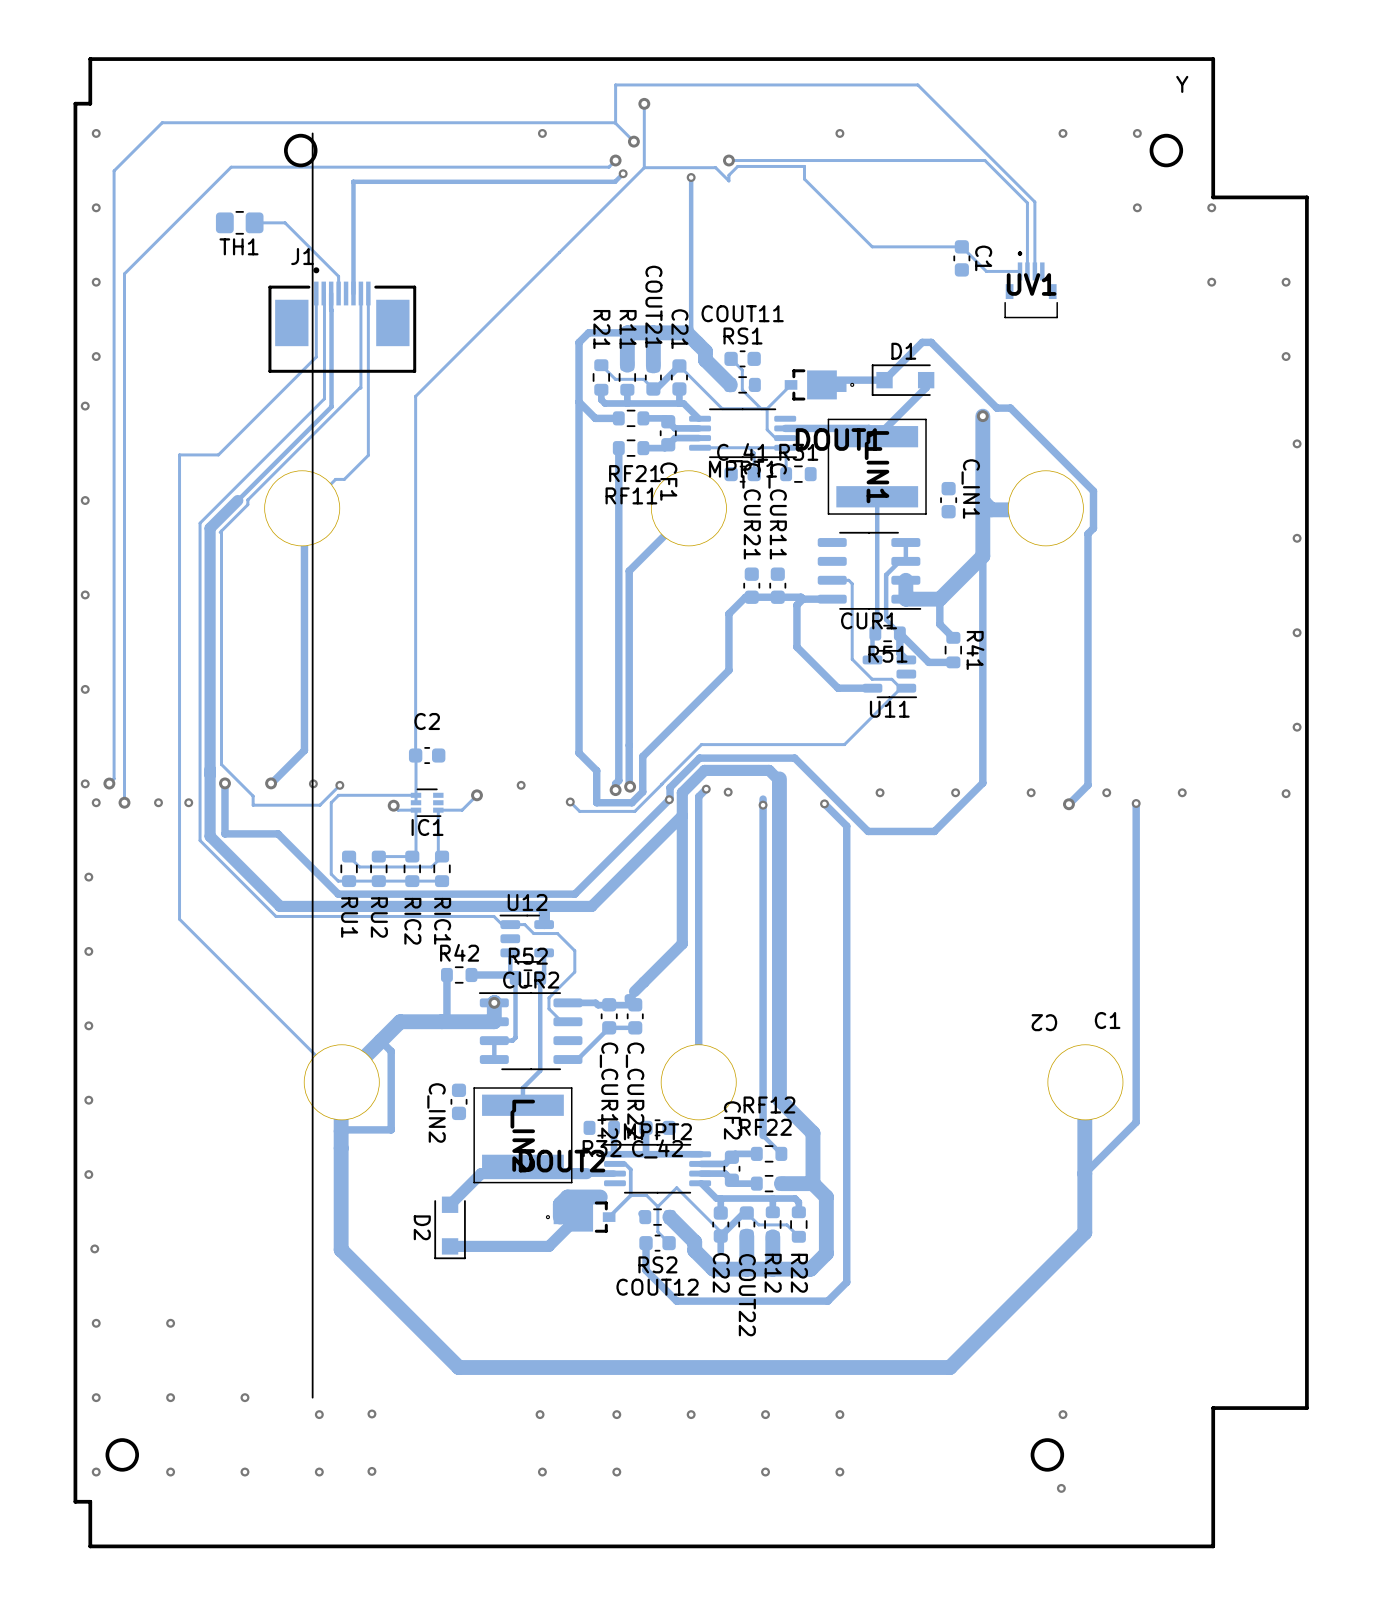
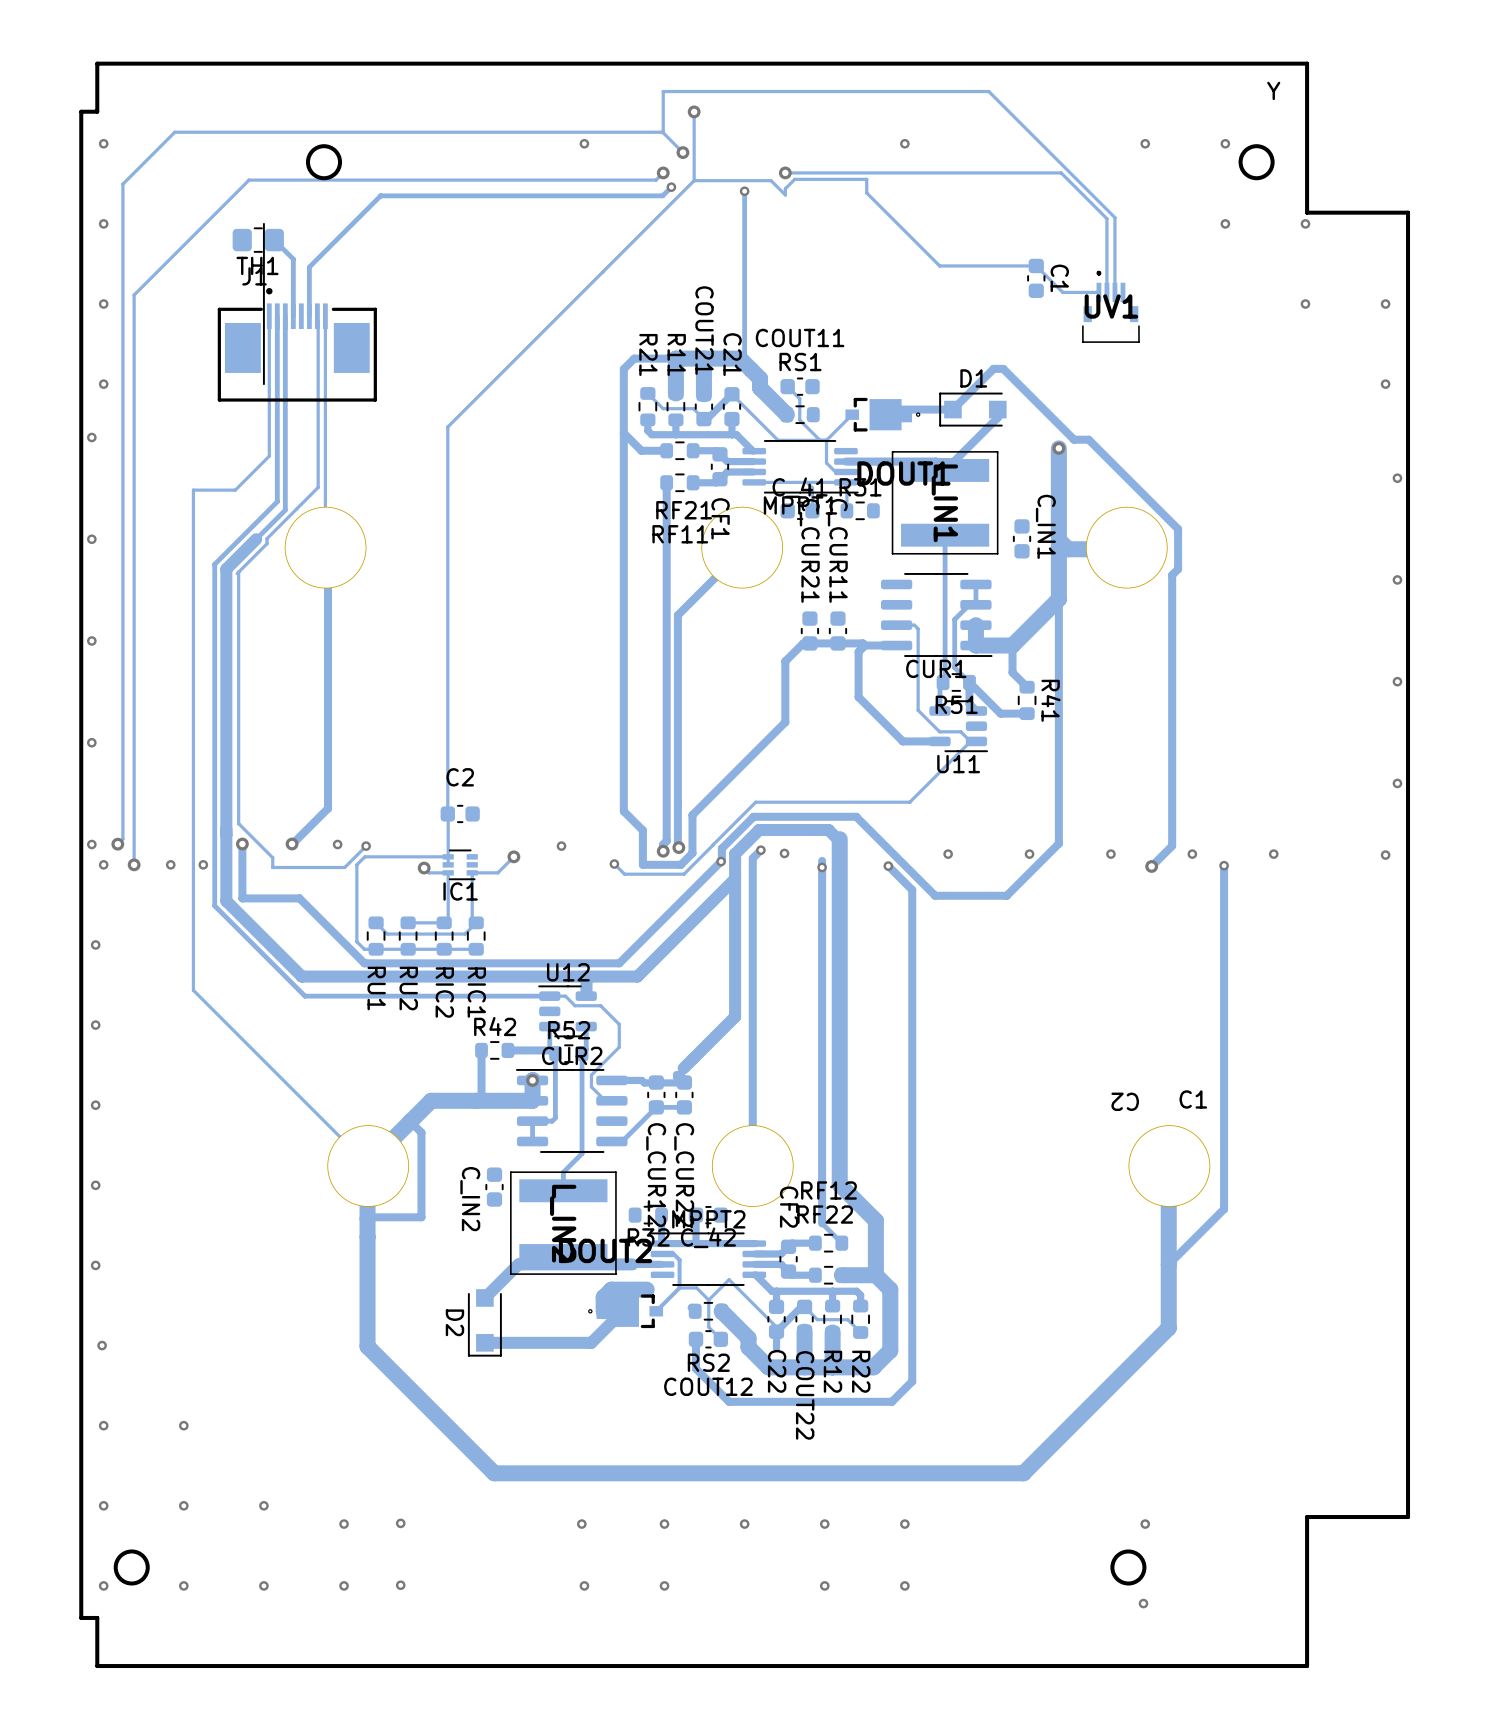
drawing shape: [73, 57, 1309, 1549] -> [79, 61, 1411, 1669]
track: (353, 181) (353, 293) -> (380, 195) (309, 267) (309, 316)
track: (254, 222) (285, 222) (338, 276) (338, 293) -> (274, 240) (293, 259) (293, 316)
track: none -> (277, 316) (277, 501) (214, 564) (214, 905) (304, 996) (549, 996)
track: none -> (325, 316) (325, 547)
track: (316, 293) (316, 357) (249, 423) -> (269, 316) (269, 456)
track: (323, 293) (324, 398) (200, 523) (200, 840) (276, 916) (493, 916) (502, 924) -> none
track: (331, 293) (331, 406) (264, 473) -> (285, 316) (285, 510)
track: (360, 293) (360, 388) (295, 452) -> (318, 320) (318, 487)
track: (368, 293) (368, 455) (344, 479) (335, 479) (305, 509) -> none
J1 position: (342, 320) -> (297, 344)

